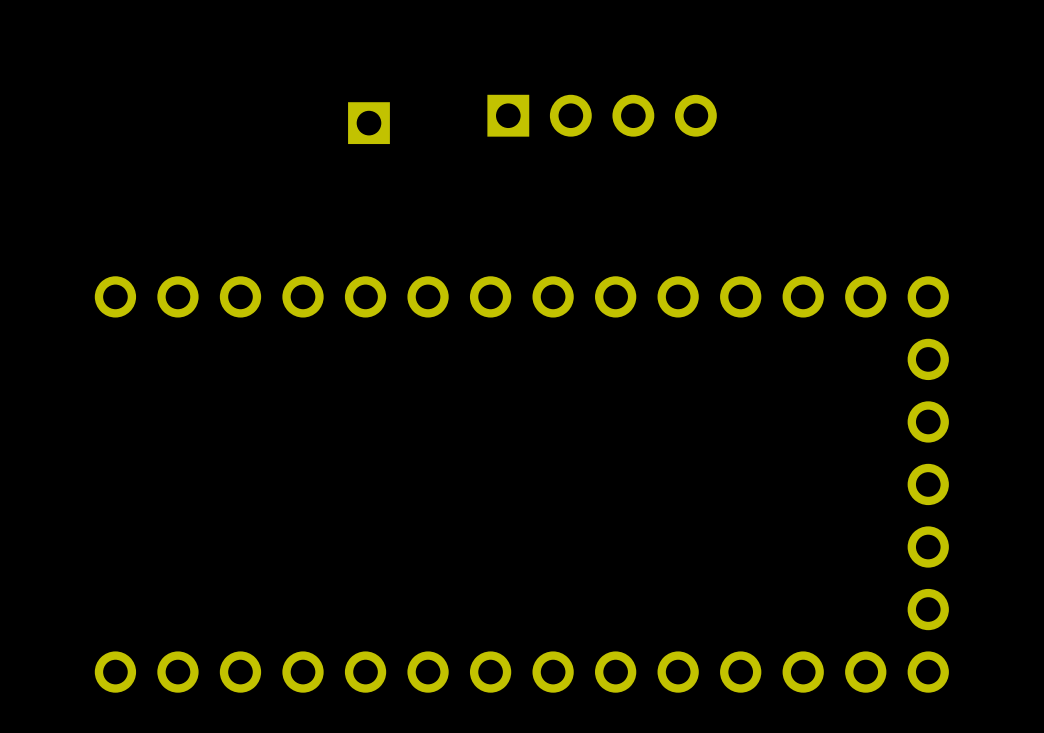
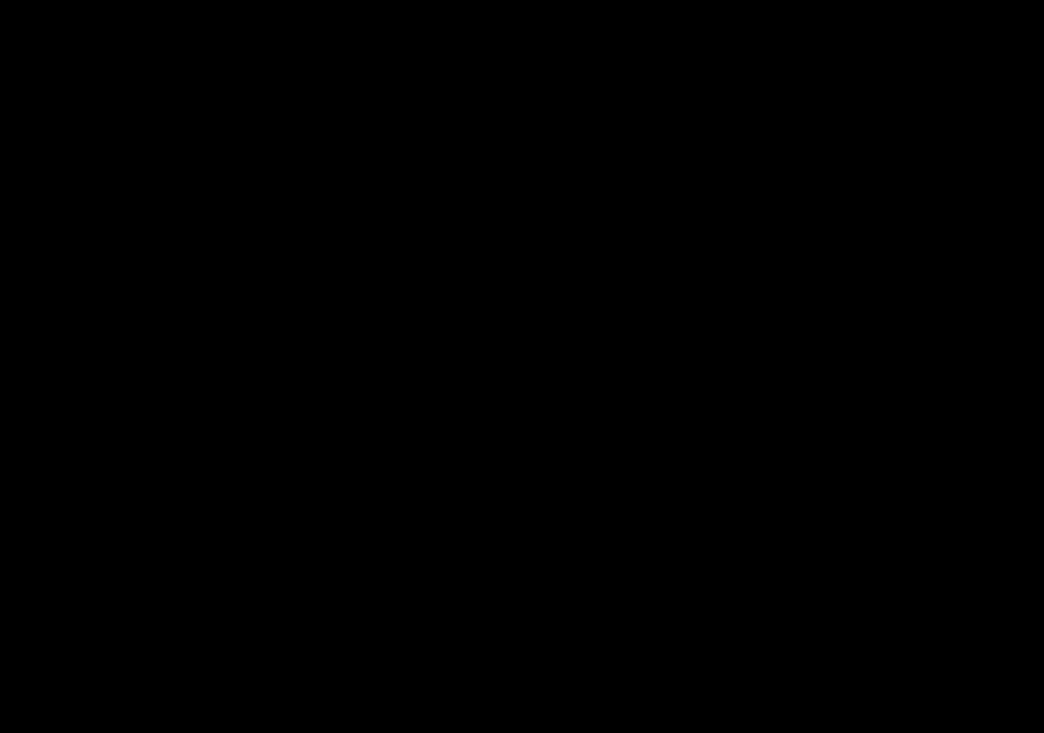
part: (602, 115) -> none
part: (368, 123) -> none
part: (521, 484) -> none

